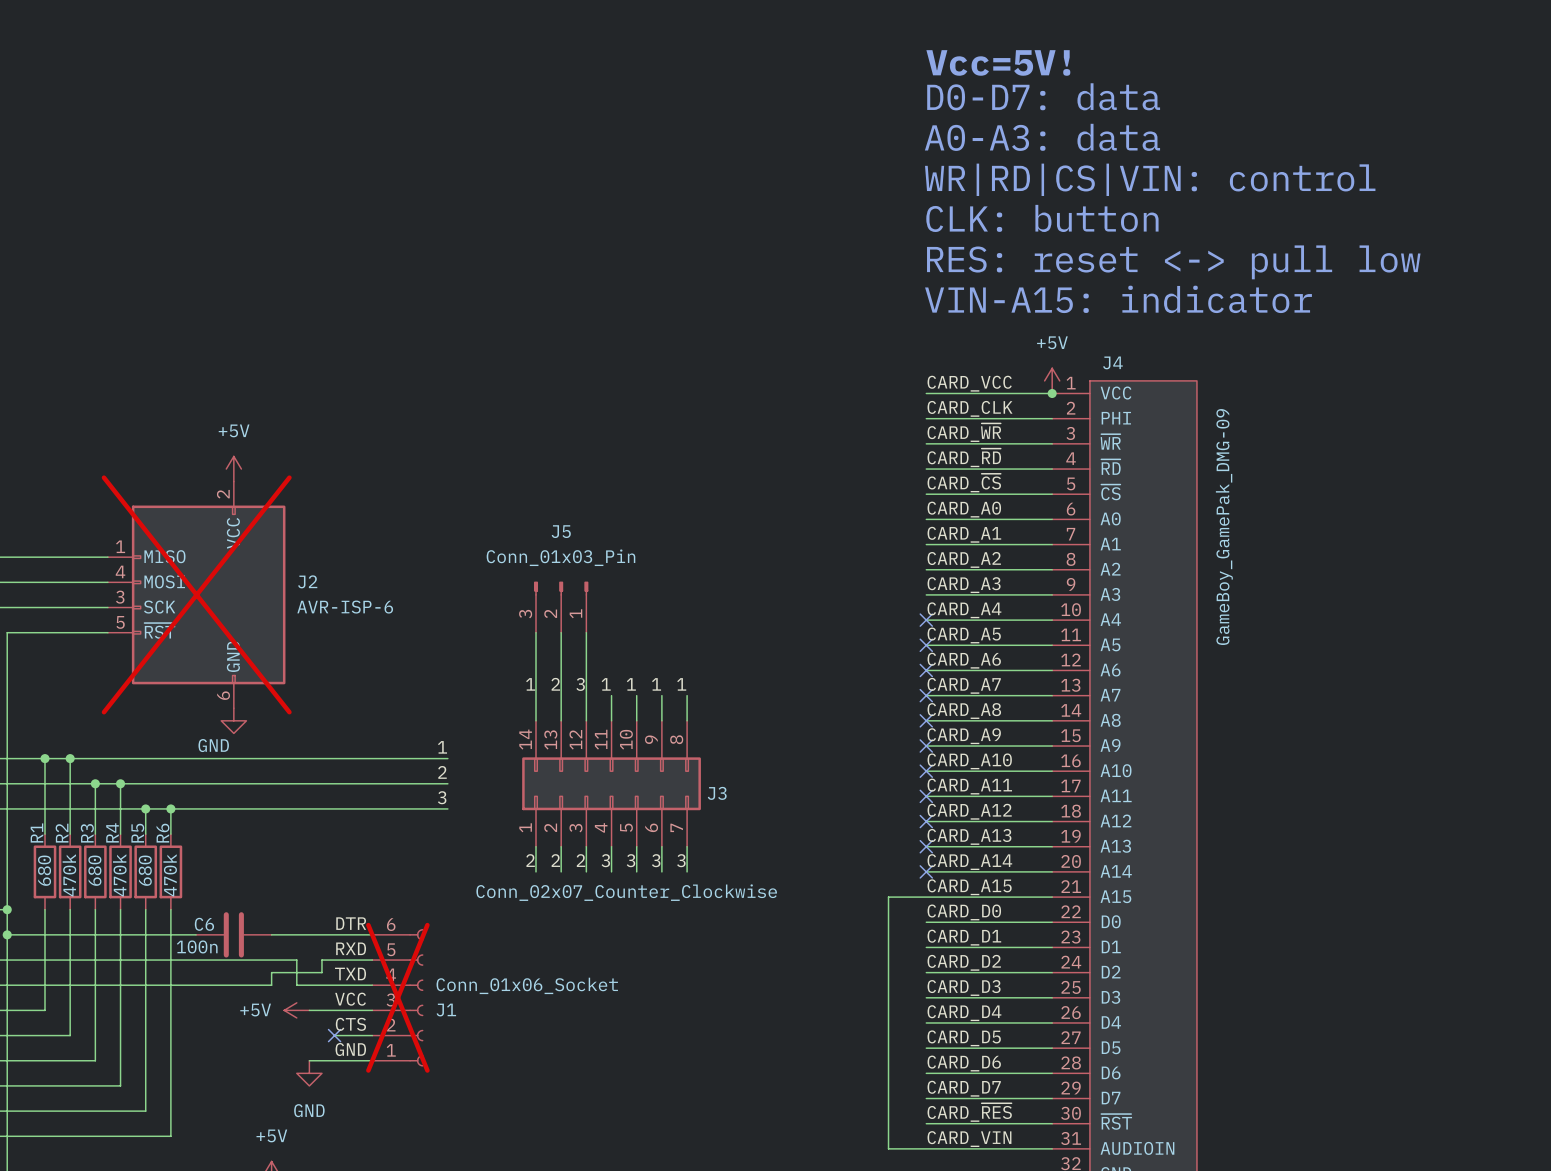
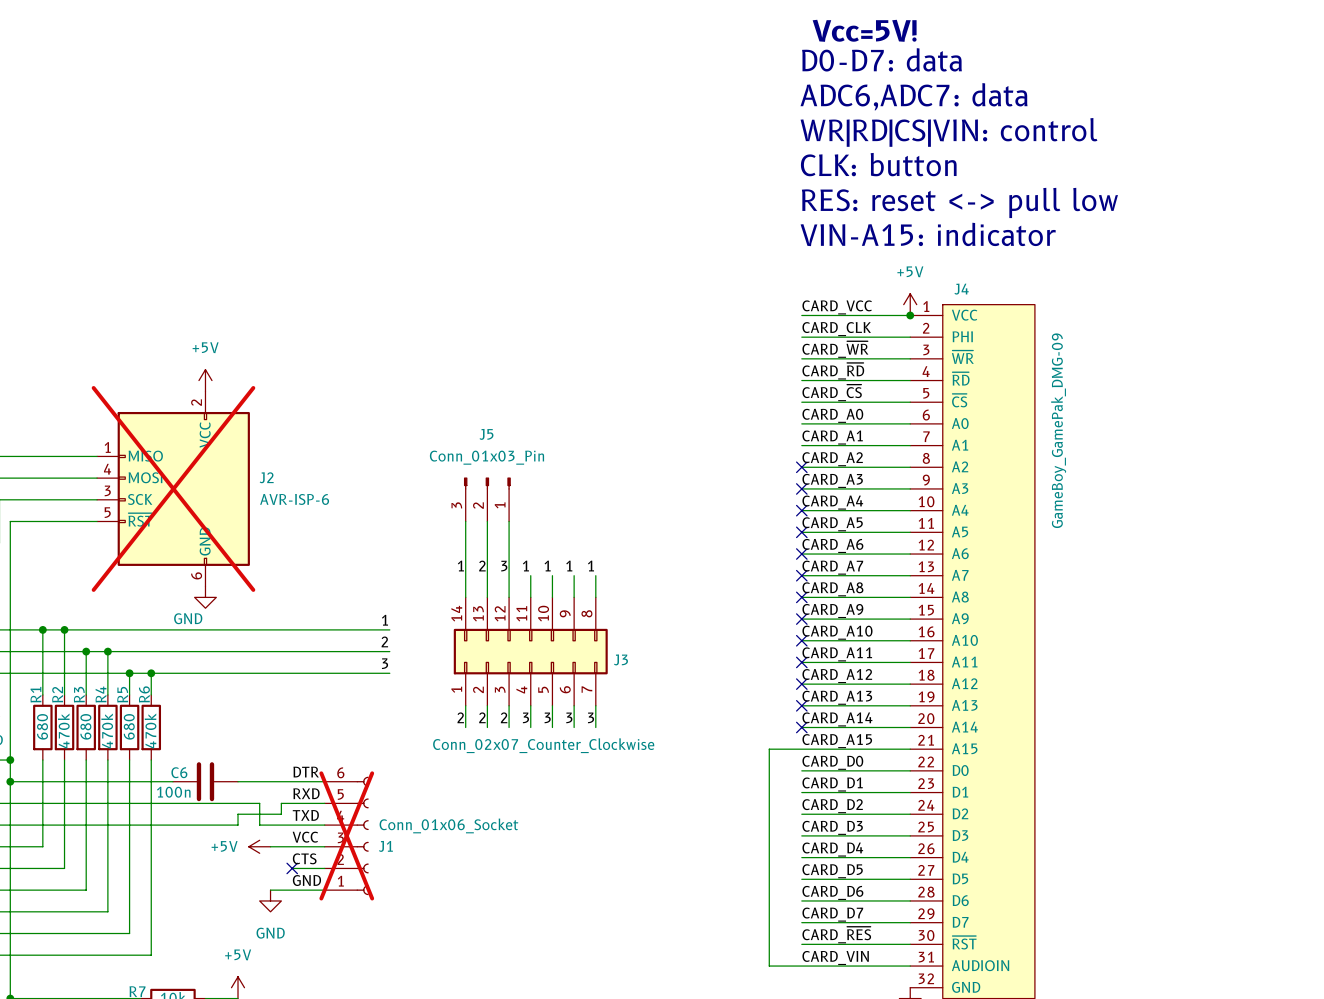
text: A0-A3: data (1042, 137) -> ADC6,ADC7: data (914, 96)
no-connect mark: none -> (801, 467)
no-connect mark: none -> (801, 488)

